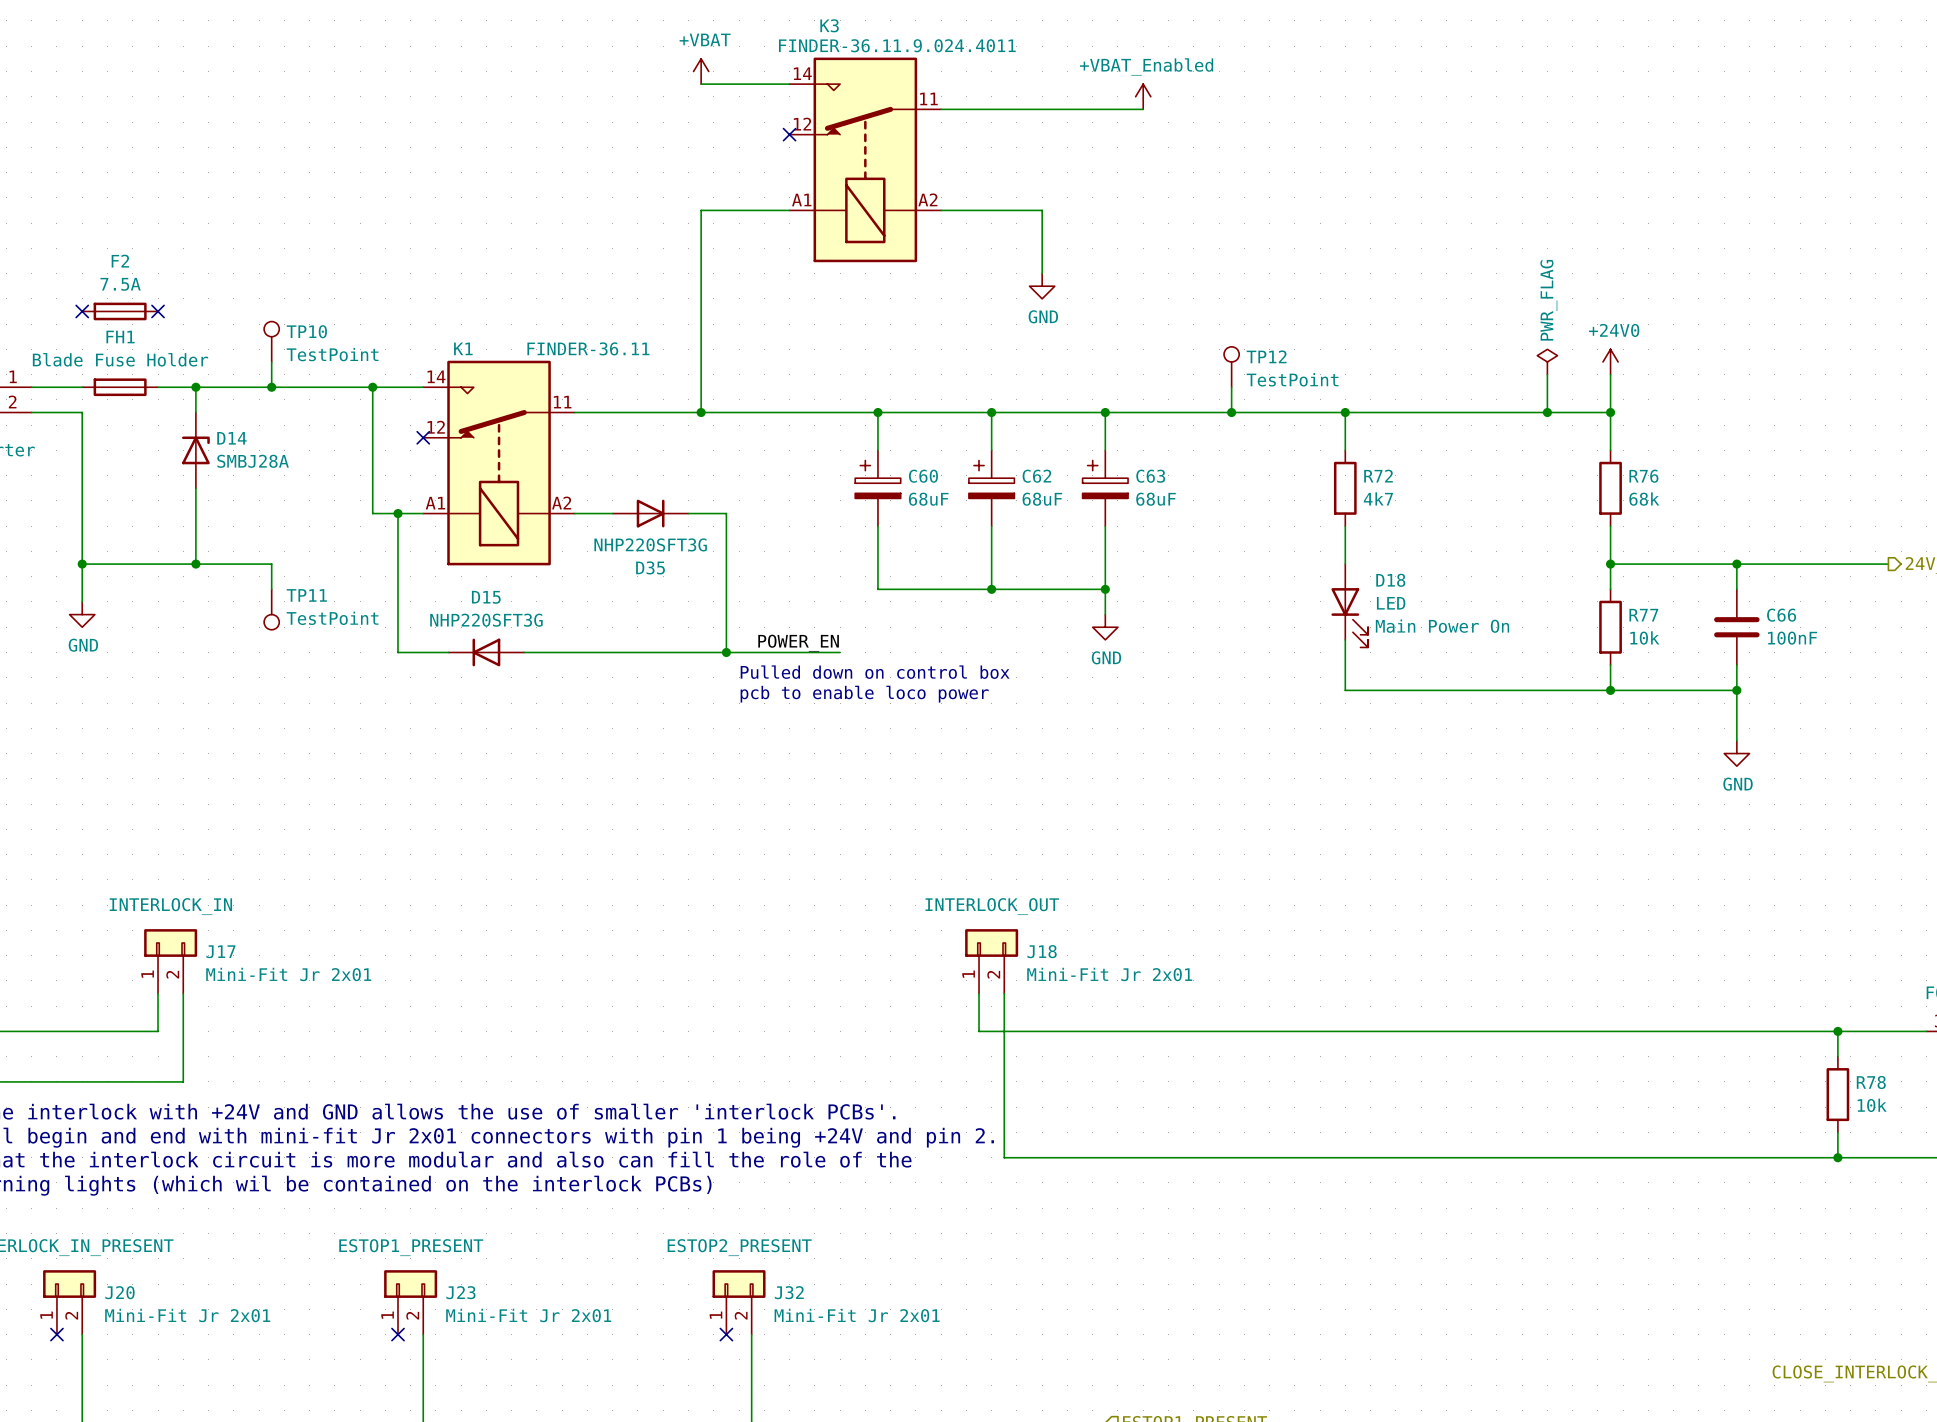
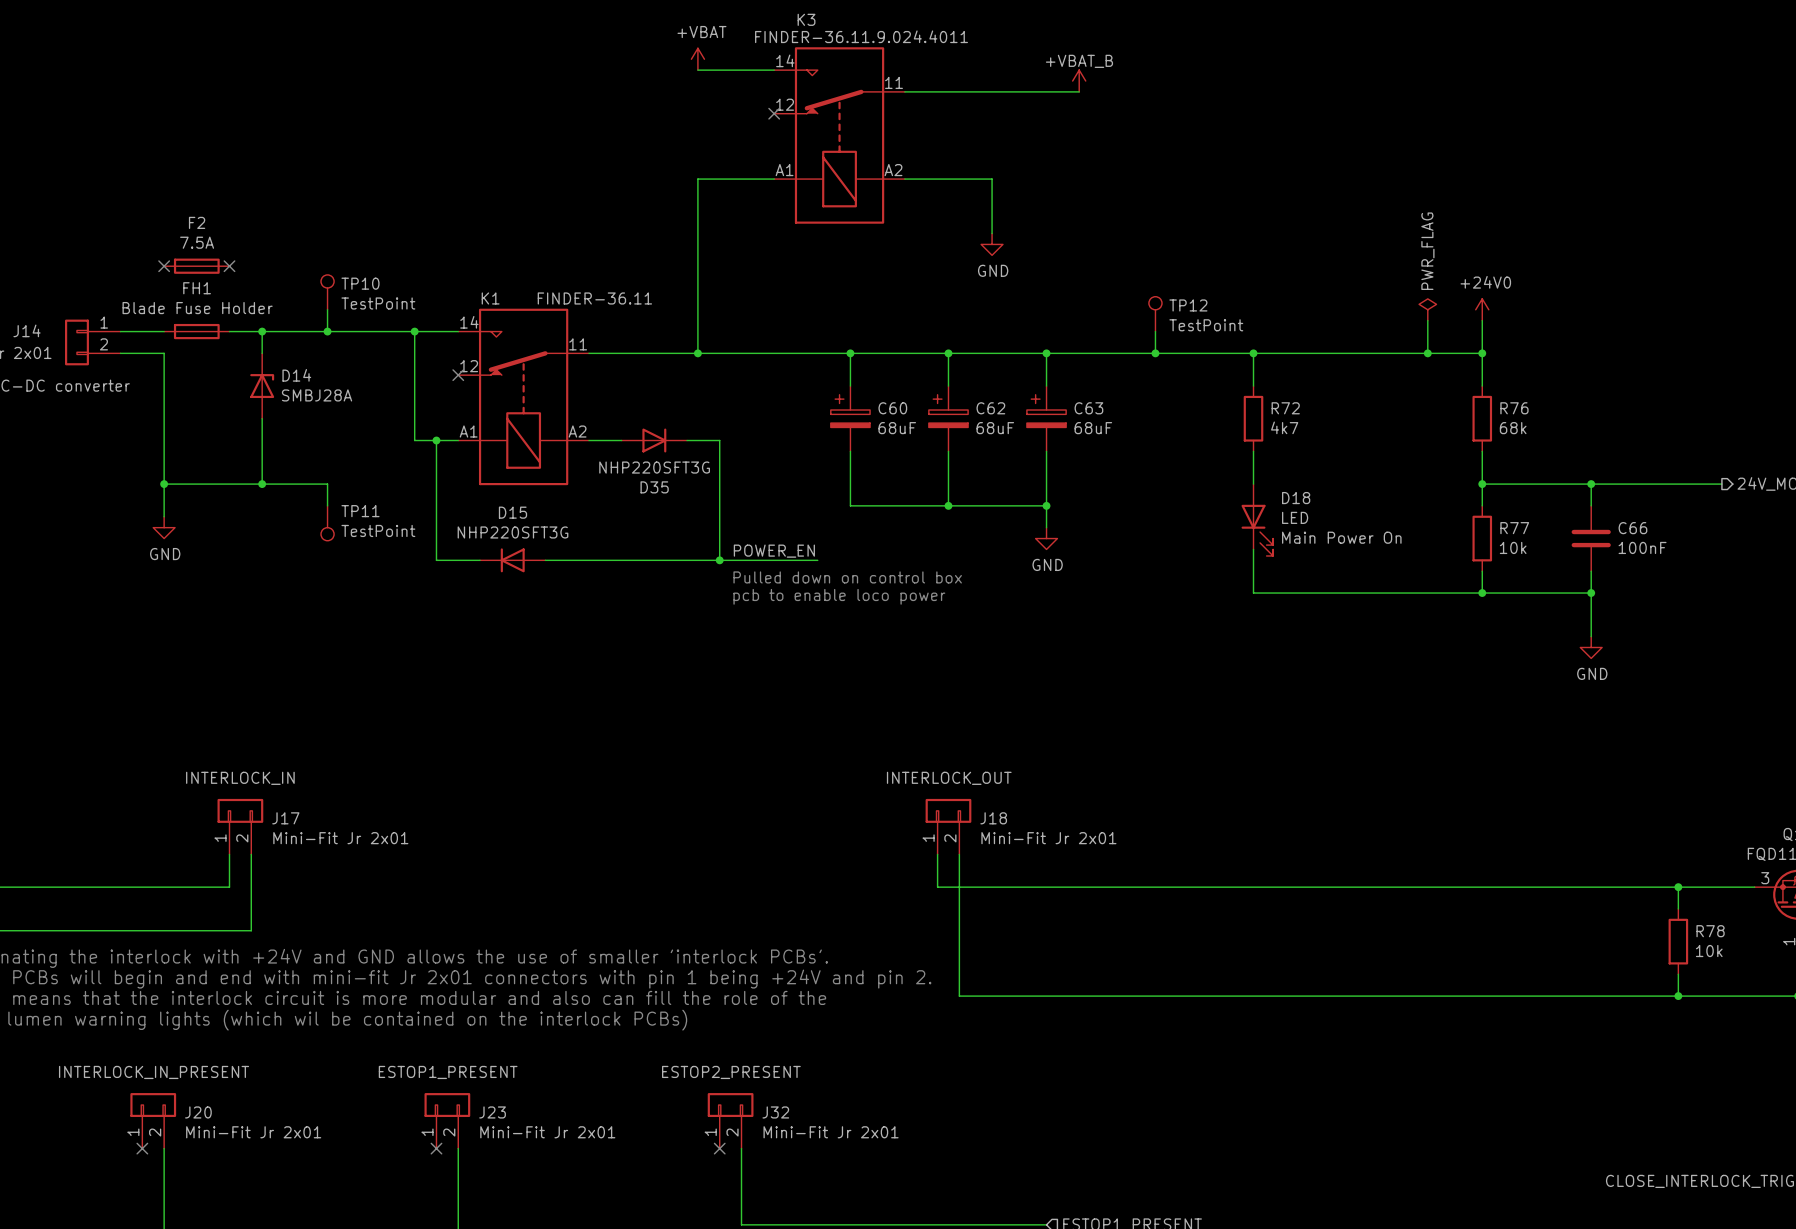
power symbol: +VBAT_Enabled (1143, 96) -> +VBAT_B (1079, 81)

